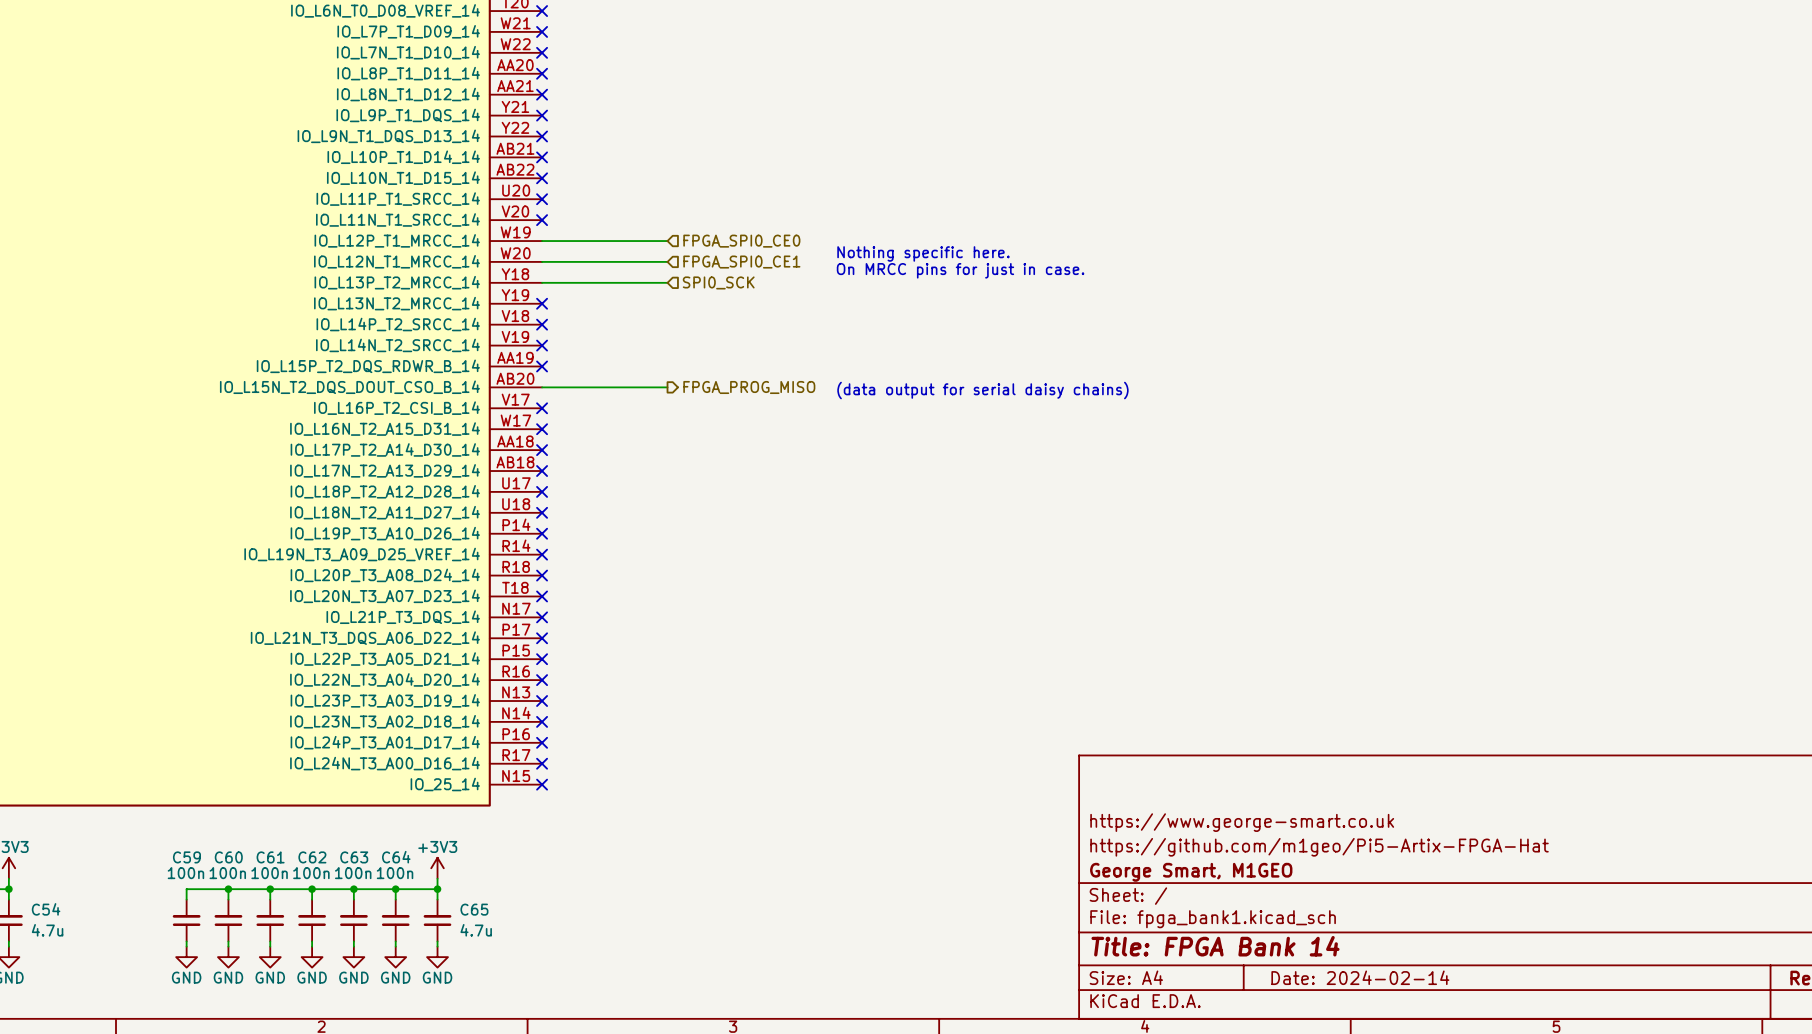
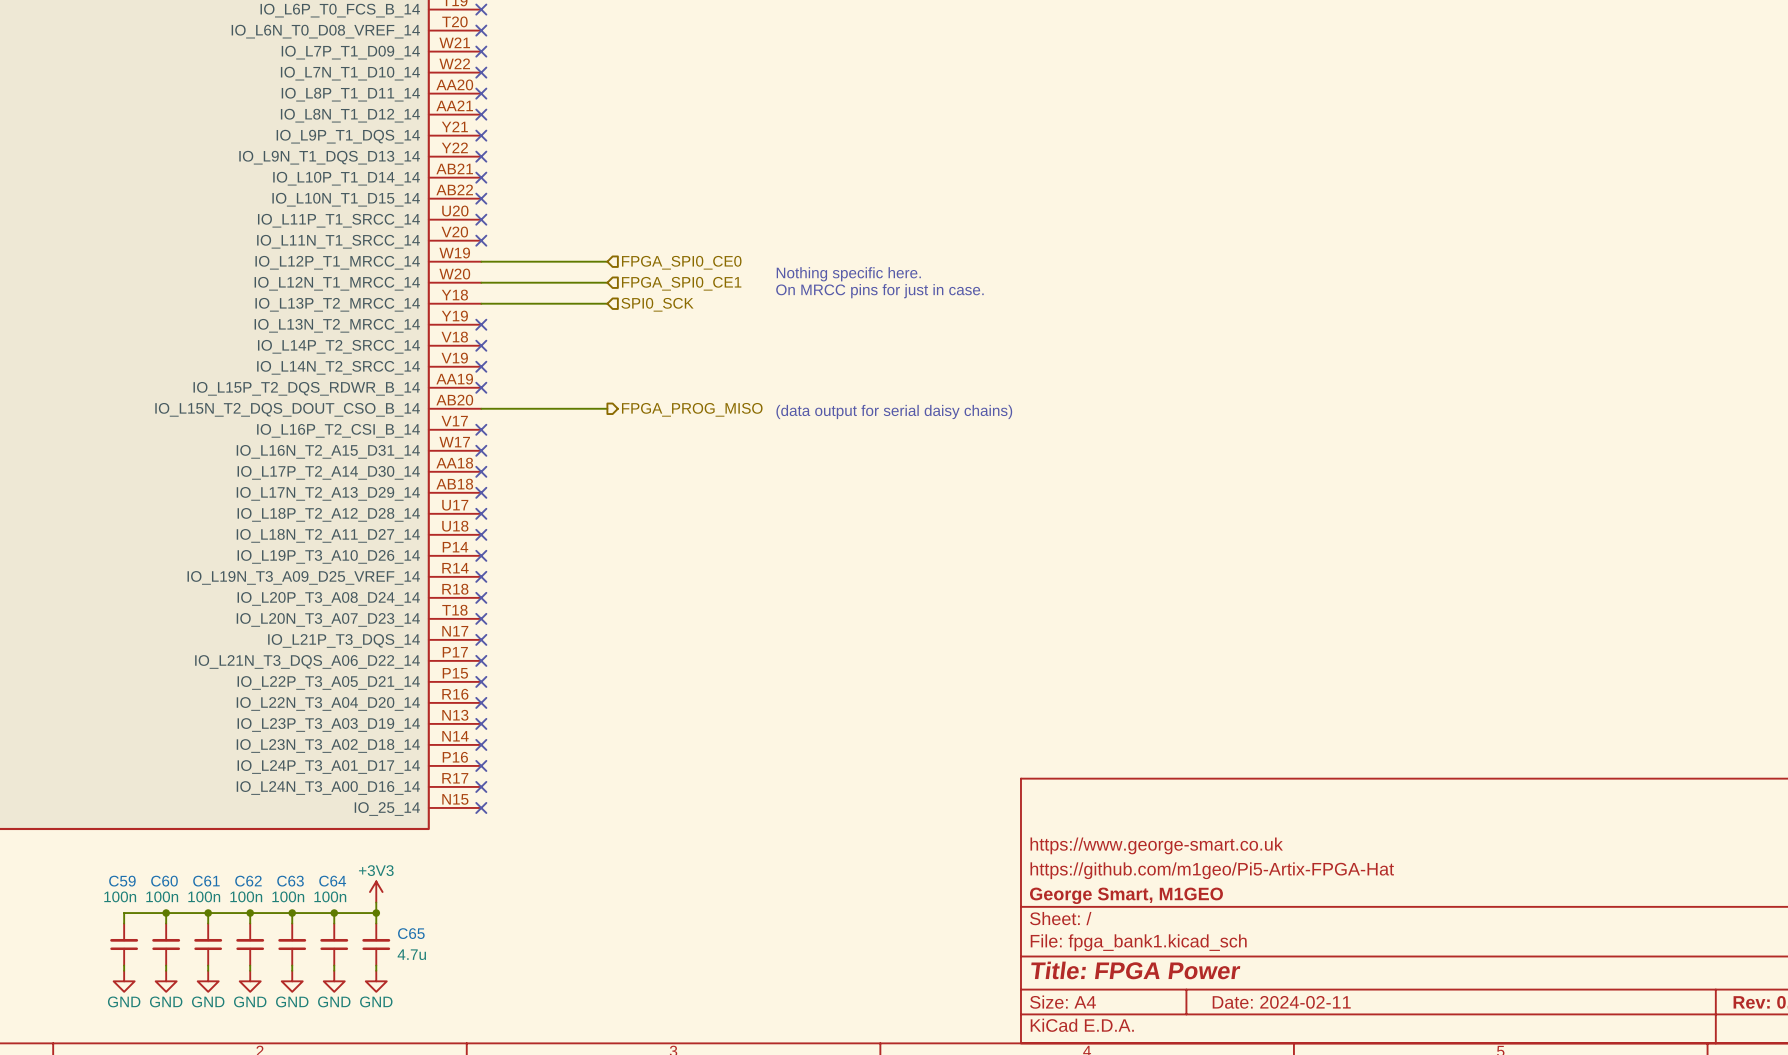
title block: Title: FPGA Bank 14 (1215, 946) -> Title: FPGA Power (1135, 970)
title block: Date: 2024-02-14 (1360, 977) -> Date: 2024-02-11 (1281, 1002)

